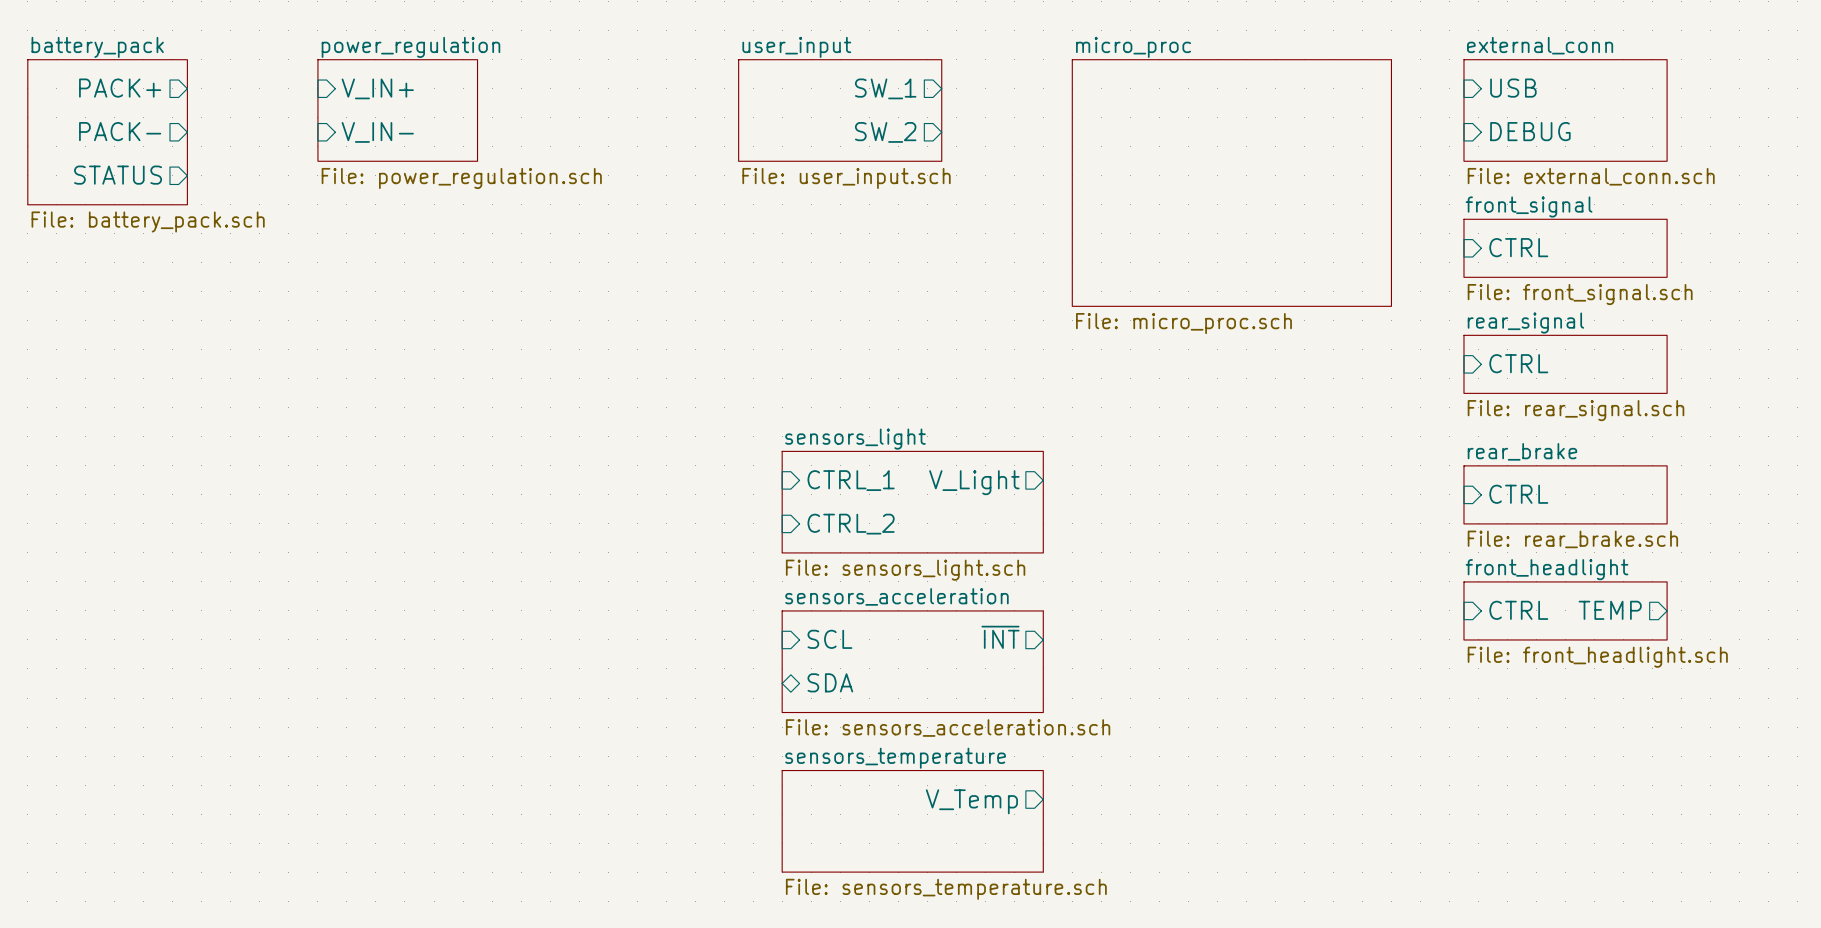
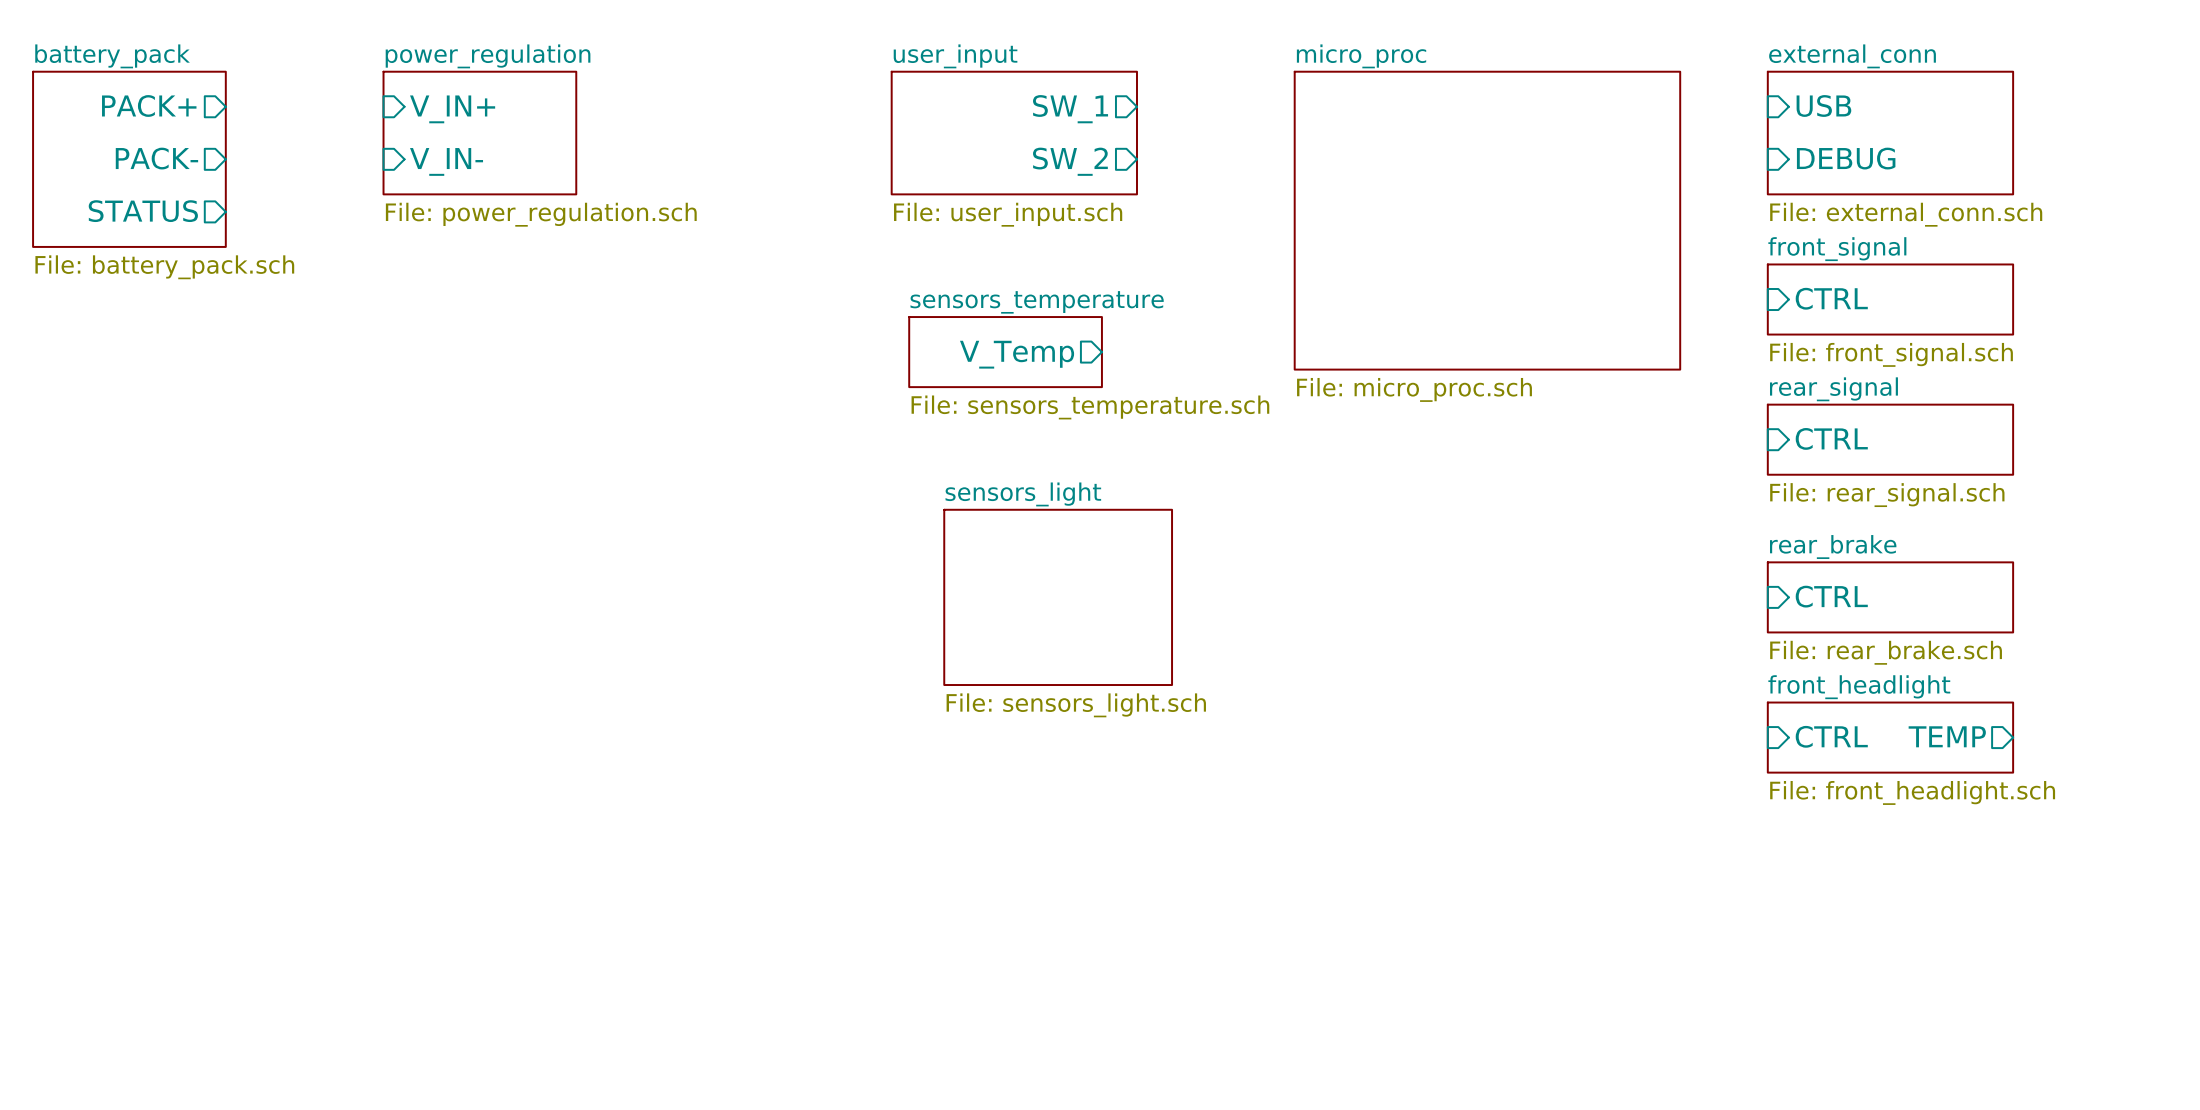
sheet sensors_temperature: none -> File: sensors_temperature.sch (1005, 352)
sheet pin: none -> V_Temp (1017, 354)
sheet pin: CTRL_1 (851, 480) -> none
sheet pin: V_Light (974, 482) -> none
sheet sensors_light: none -> File: sensors_light.sch (1058, 597)
sheet sensors_light: File: sensors_light.sch (912, 502) -> none
sheet pin: CTRL_2 (851, 524) -> none
sheet pin: ~{INT} (1000, 637) -> none
sheet pin: SCL (829, 639) -> none
sheet sensors_acceleration: File: sensors_acceleration.sch (912, 661) -> none
sheet pin: SDA (830, 682) -> none
sheet pin: V_Temp (971, 801) -> none
sheet sensors_temperature: File: sensors_temperature.sch (912, 821) -> none

